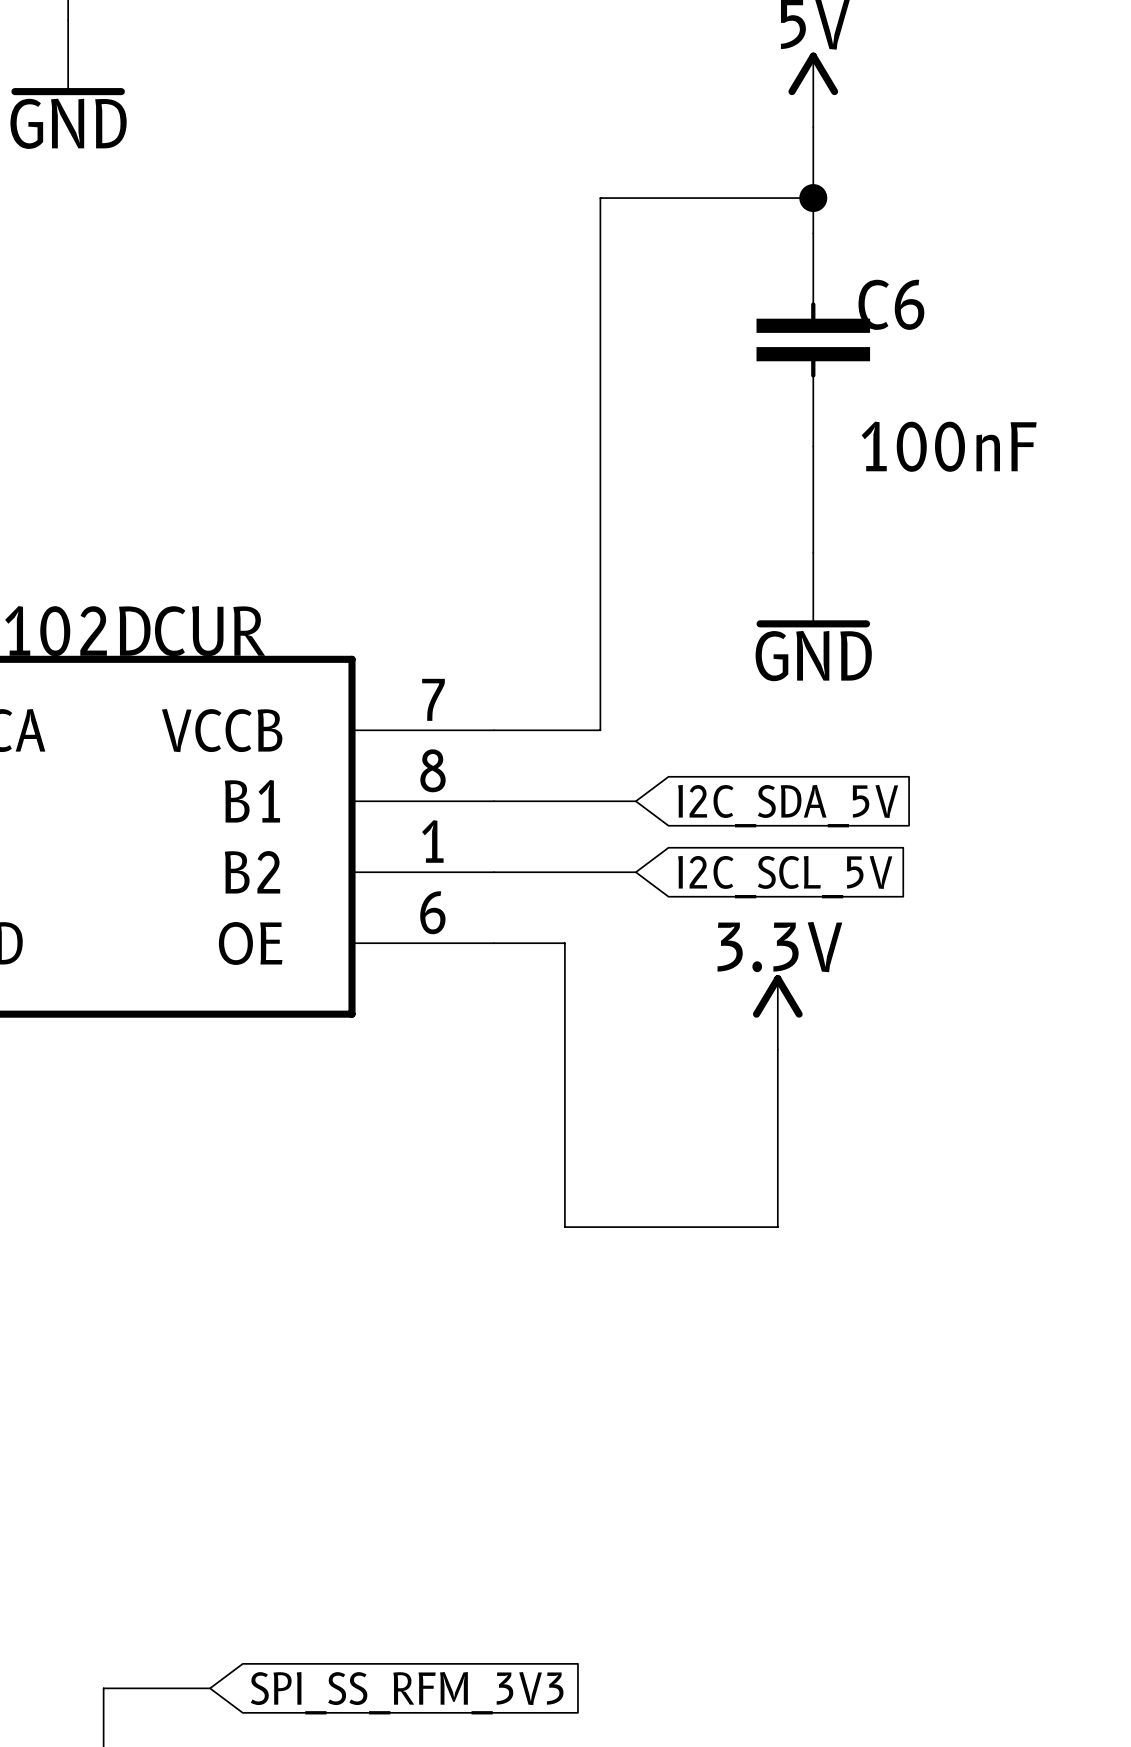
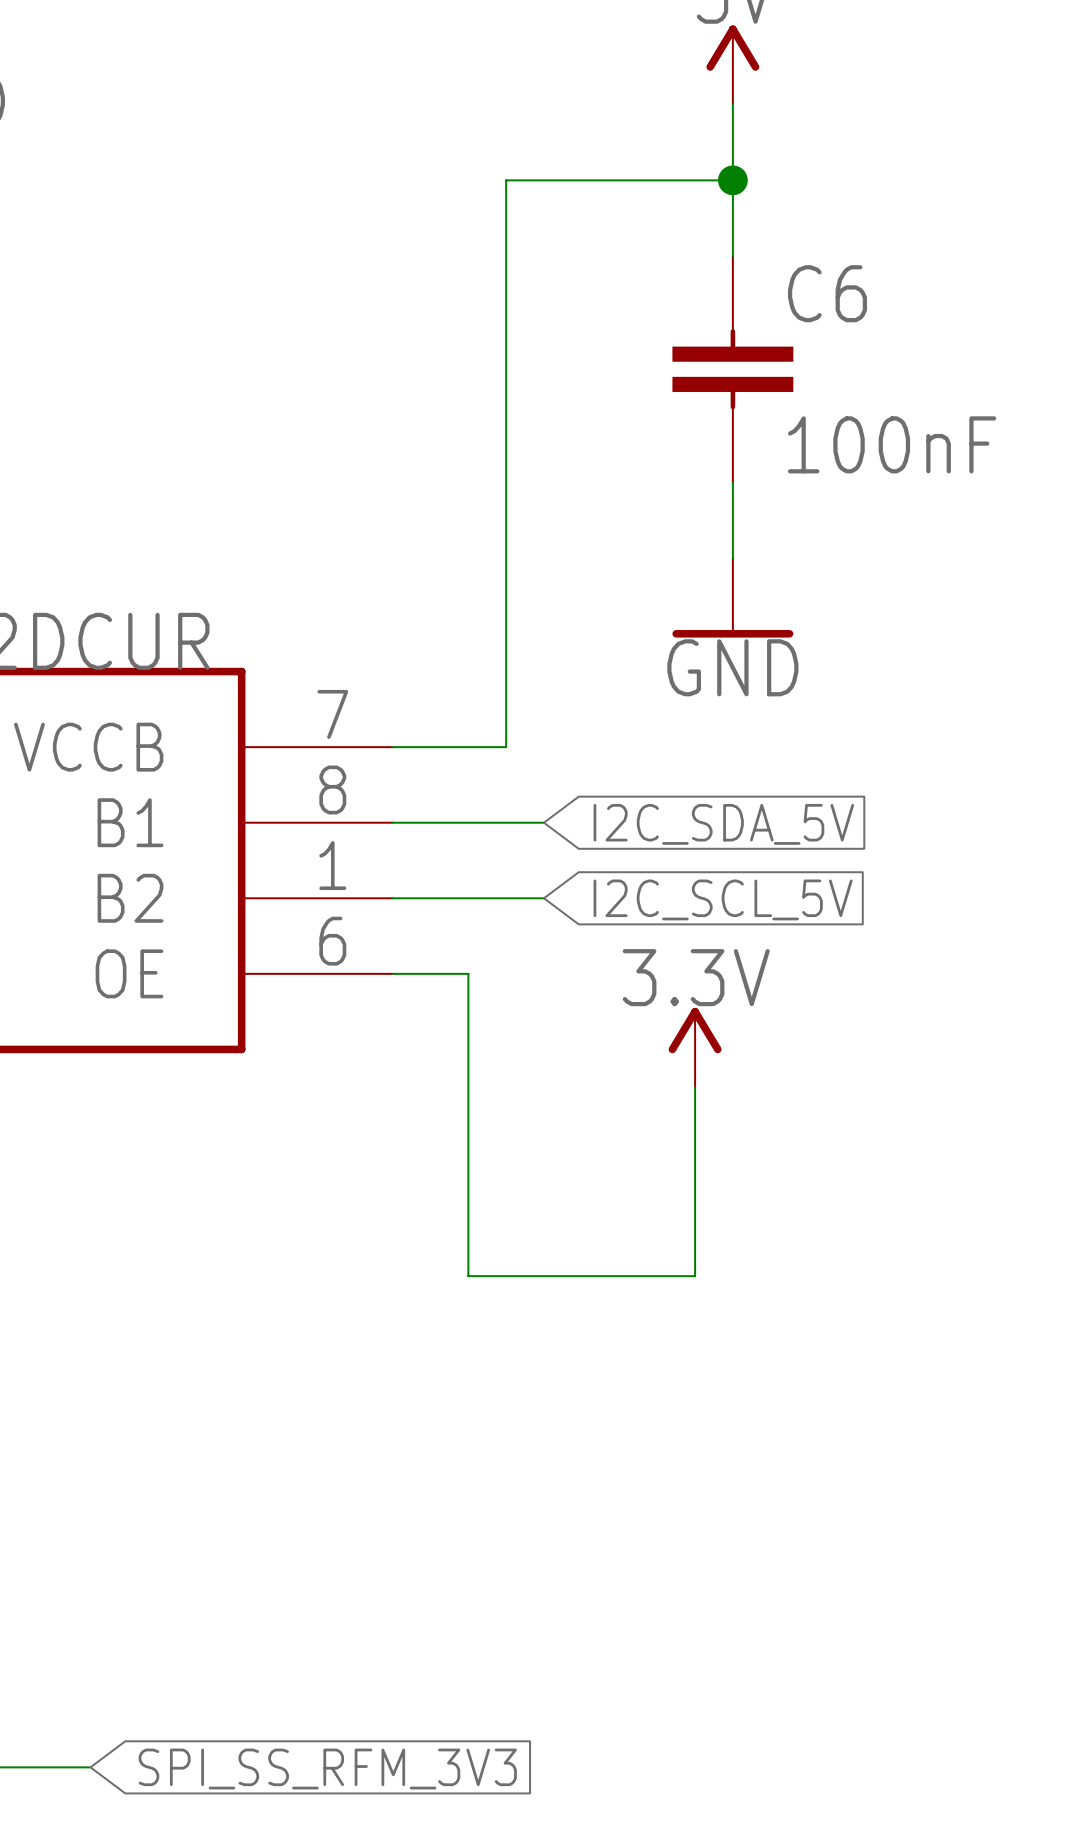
C6 position: (813, 339) -> (732, 369)

